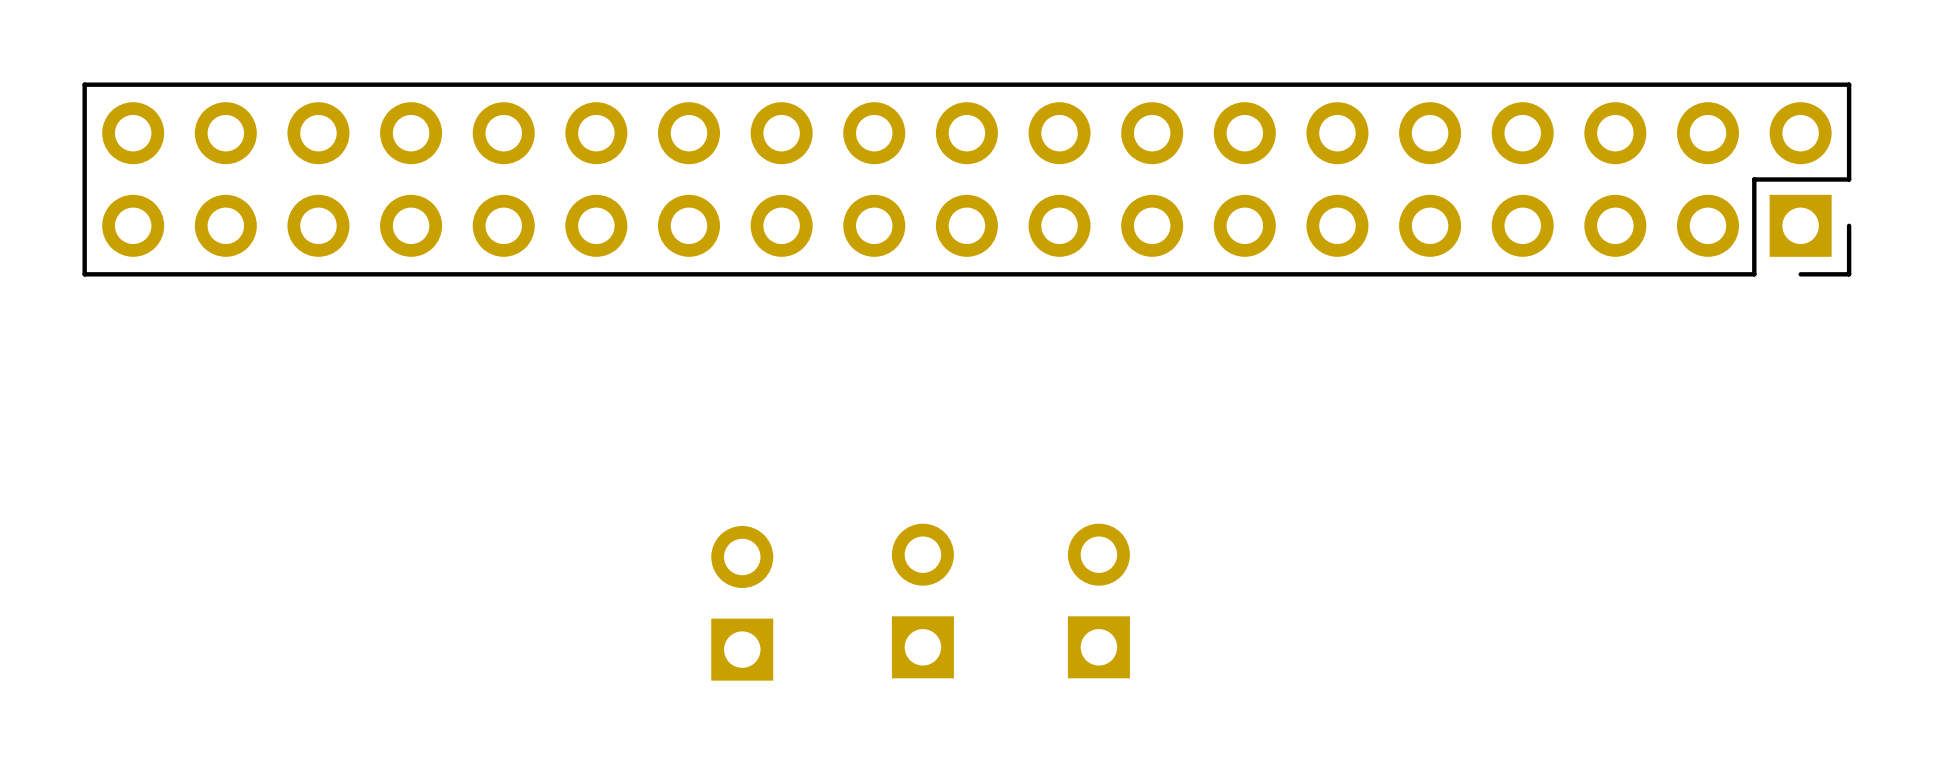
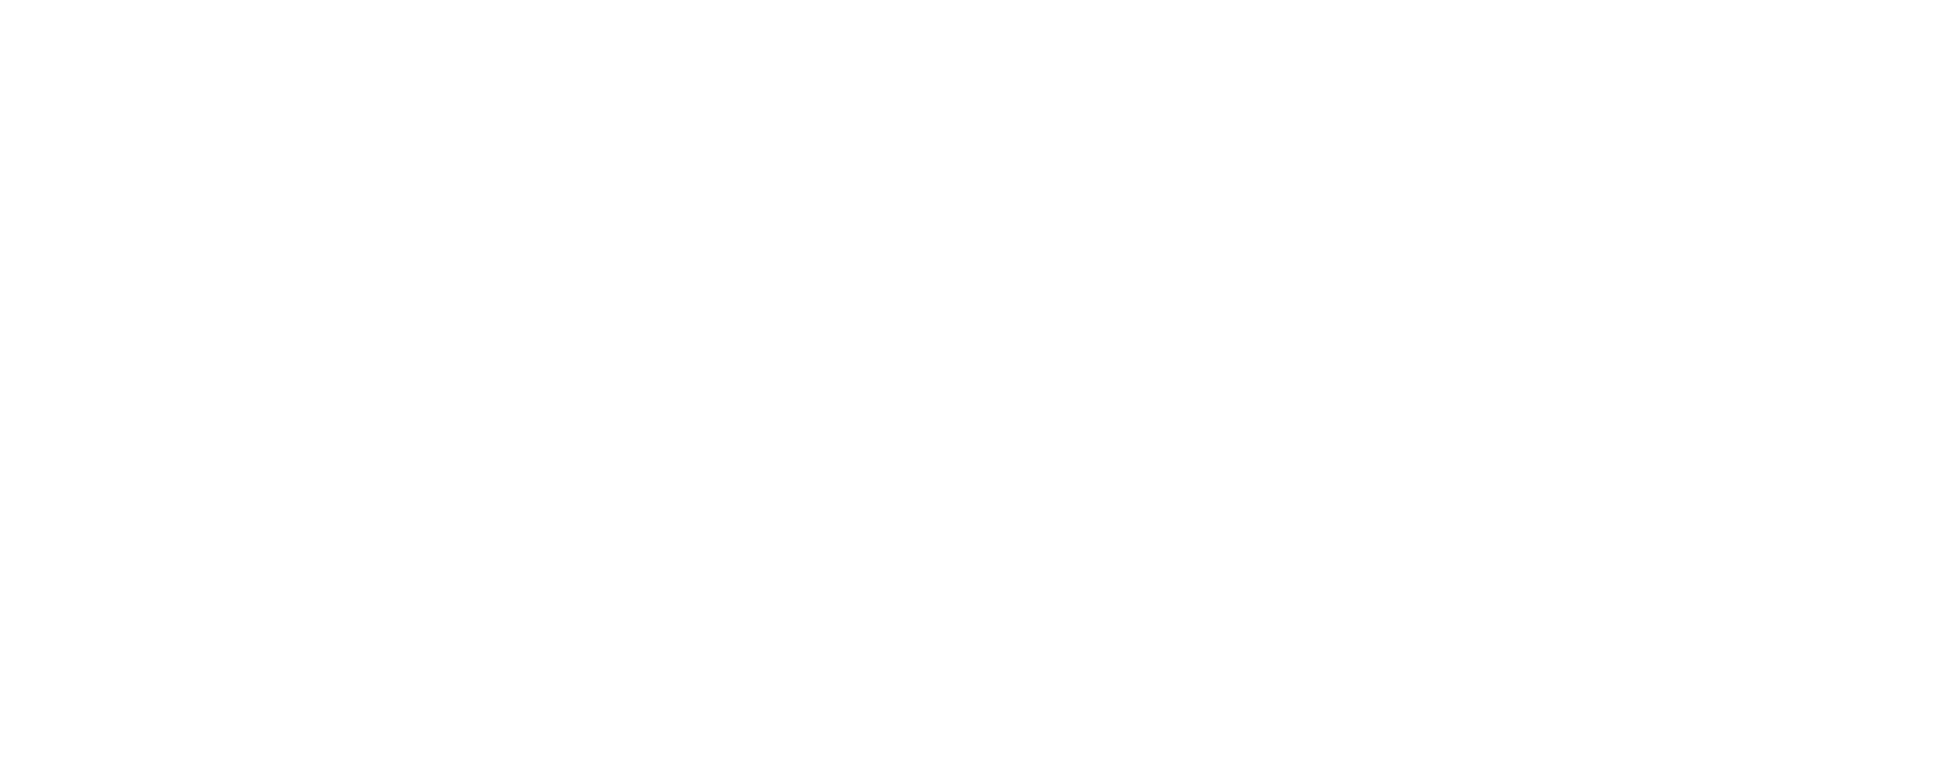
part: (966, 179) -> none
part: (922, 600) -> none
part: (1098, 600) -> none
part: (742, 603) -> none

